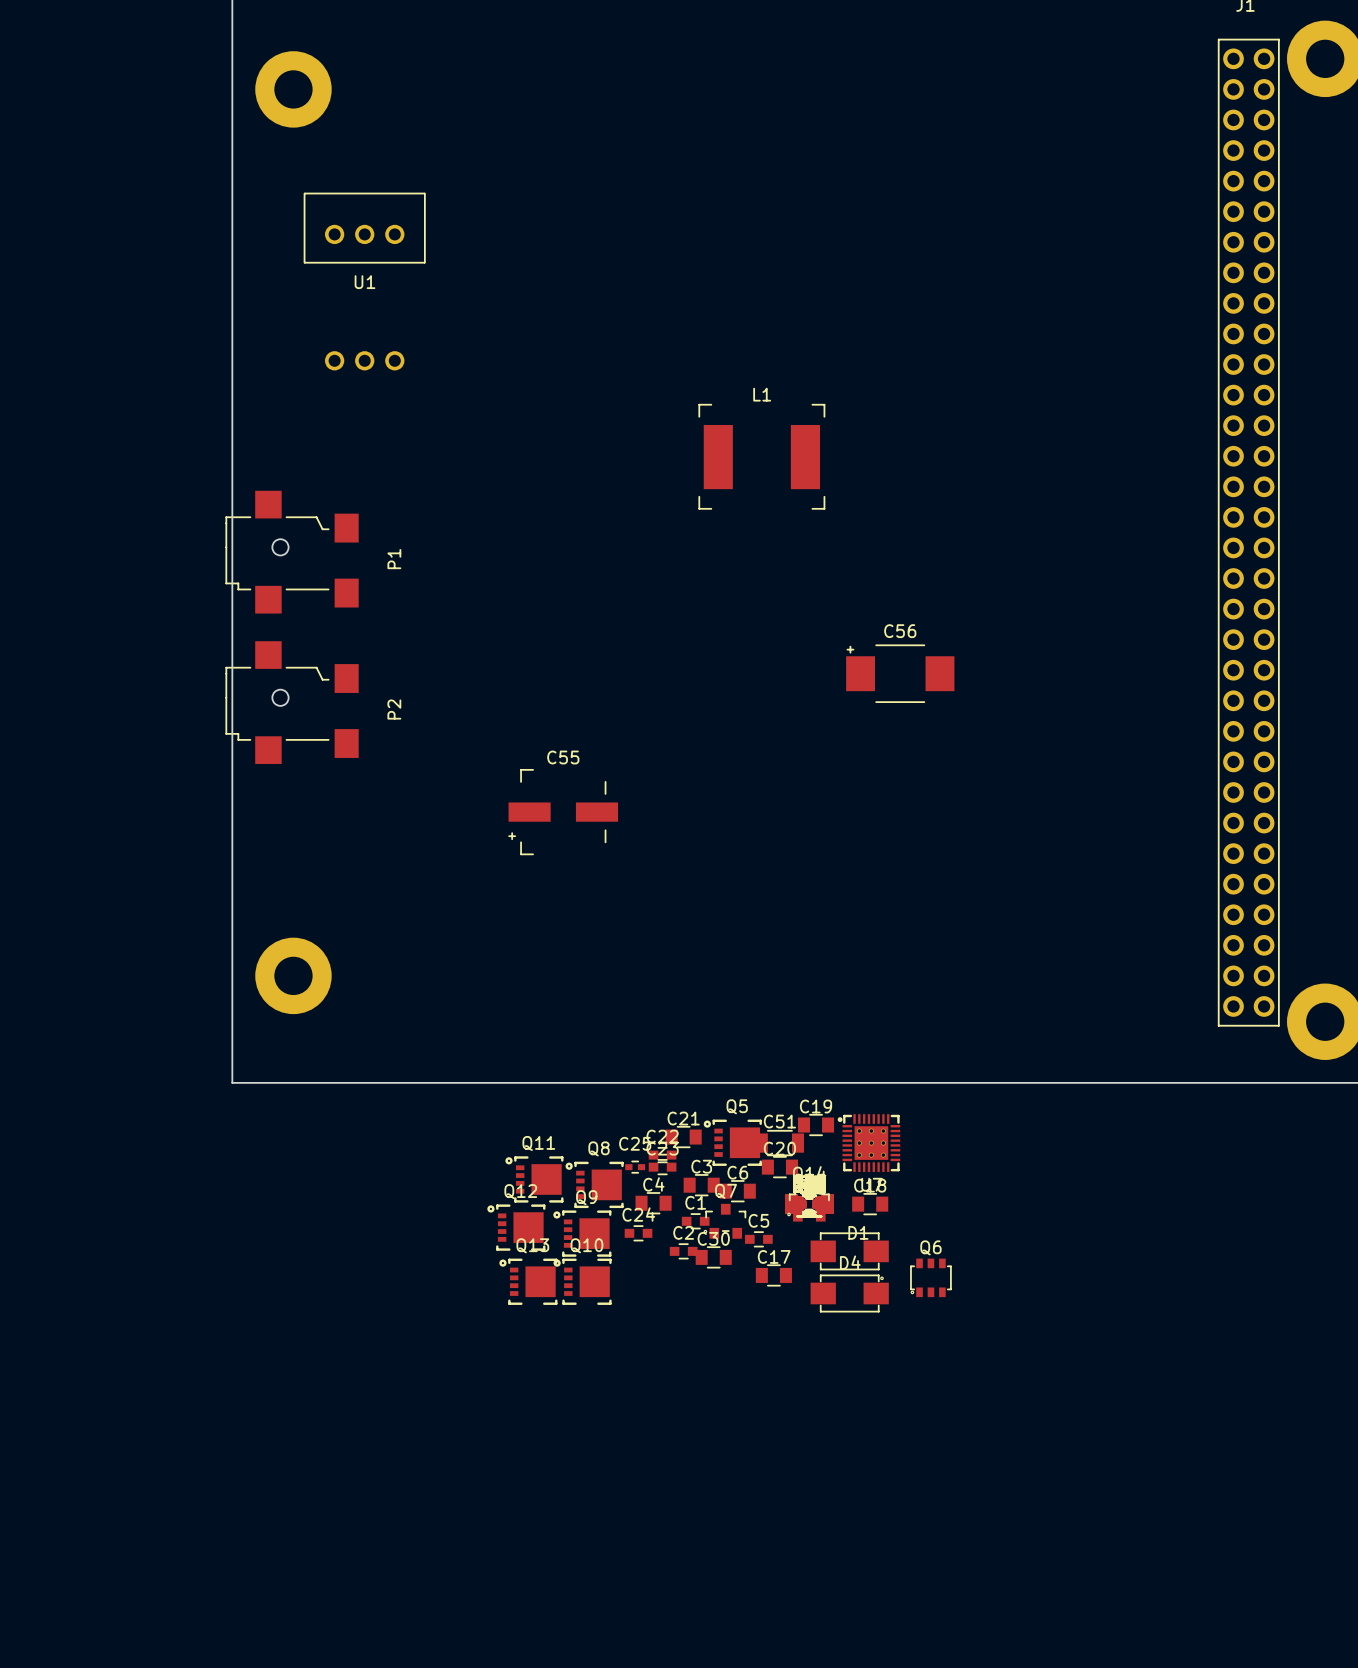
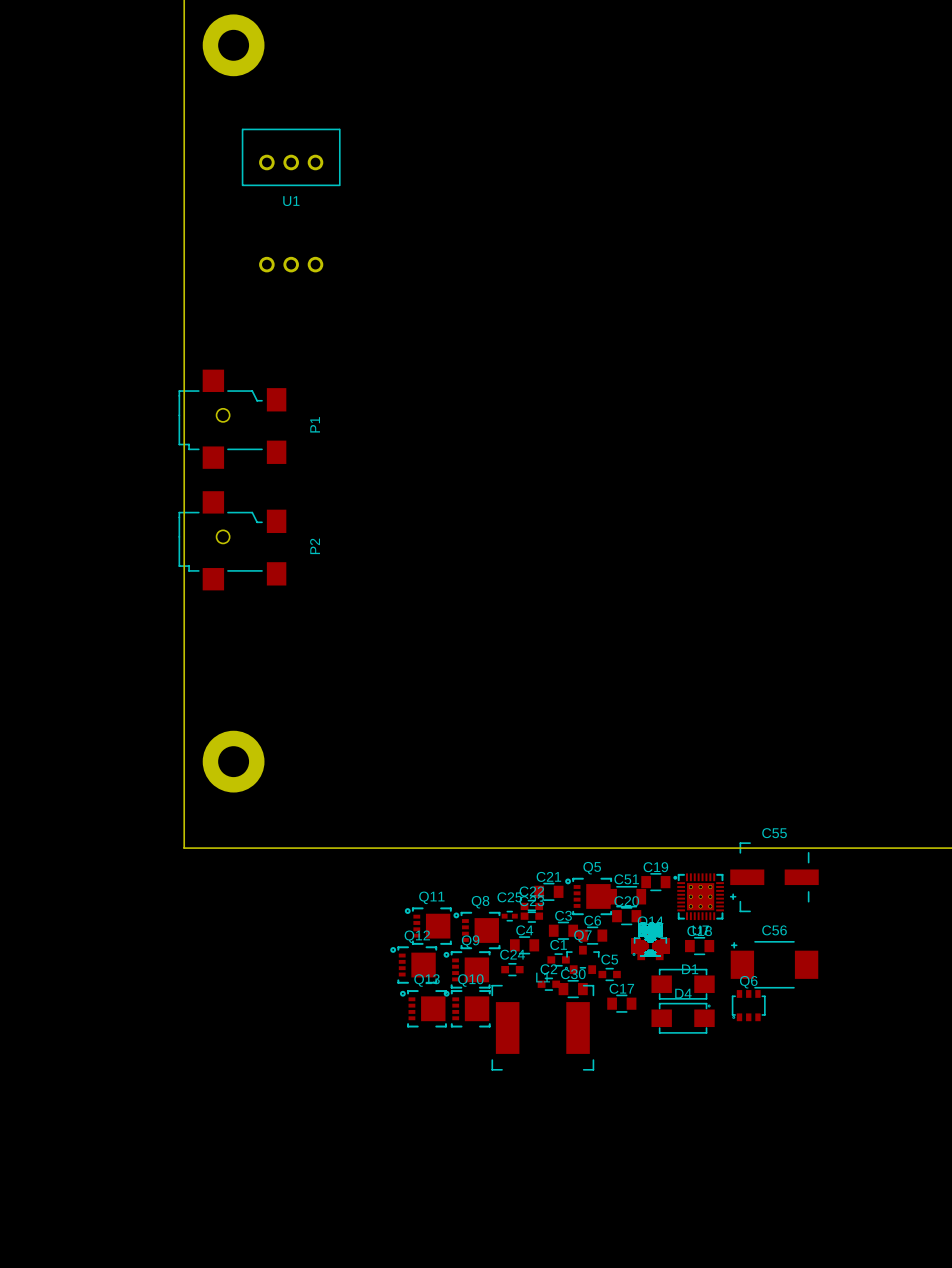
L1 position: (761, 456) -> (542, 1027)
C56 position: (900, 673) -> (774, 964)
C55 position: (563, 812) -> (774, 877)

